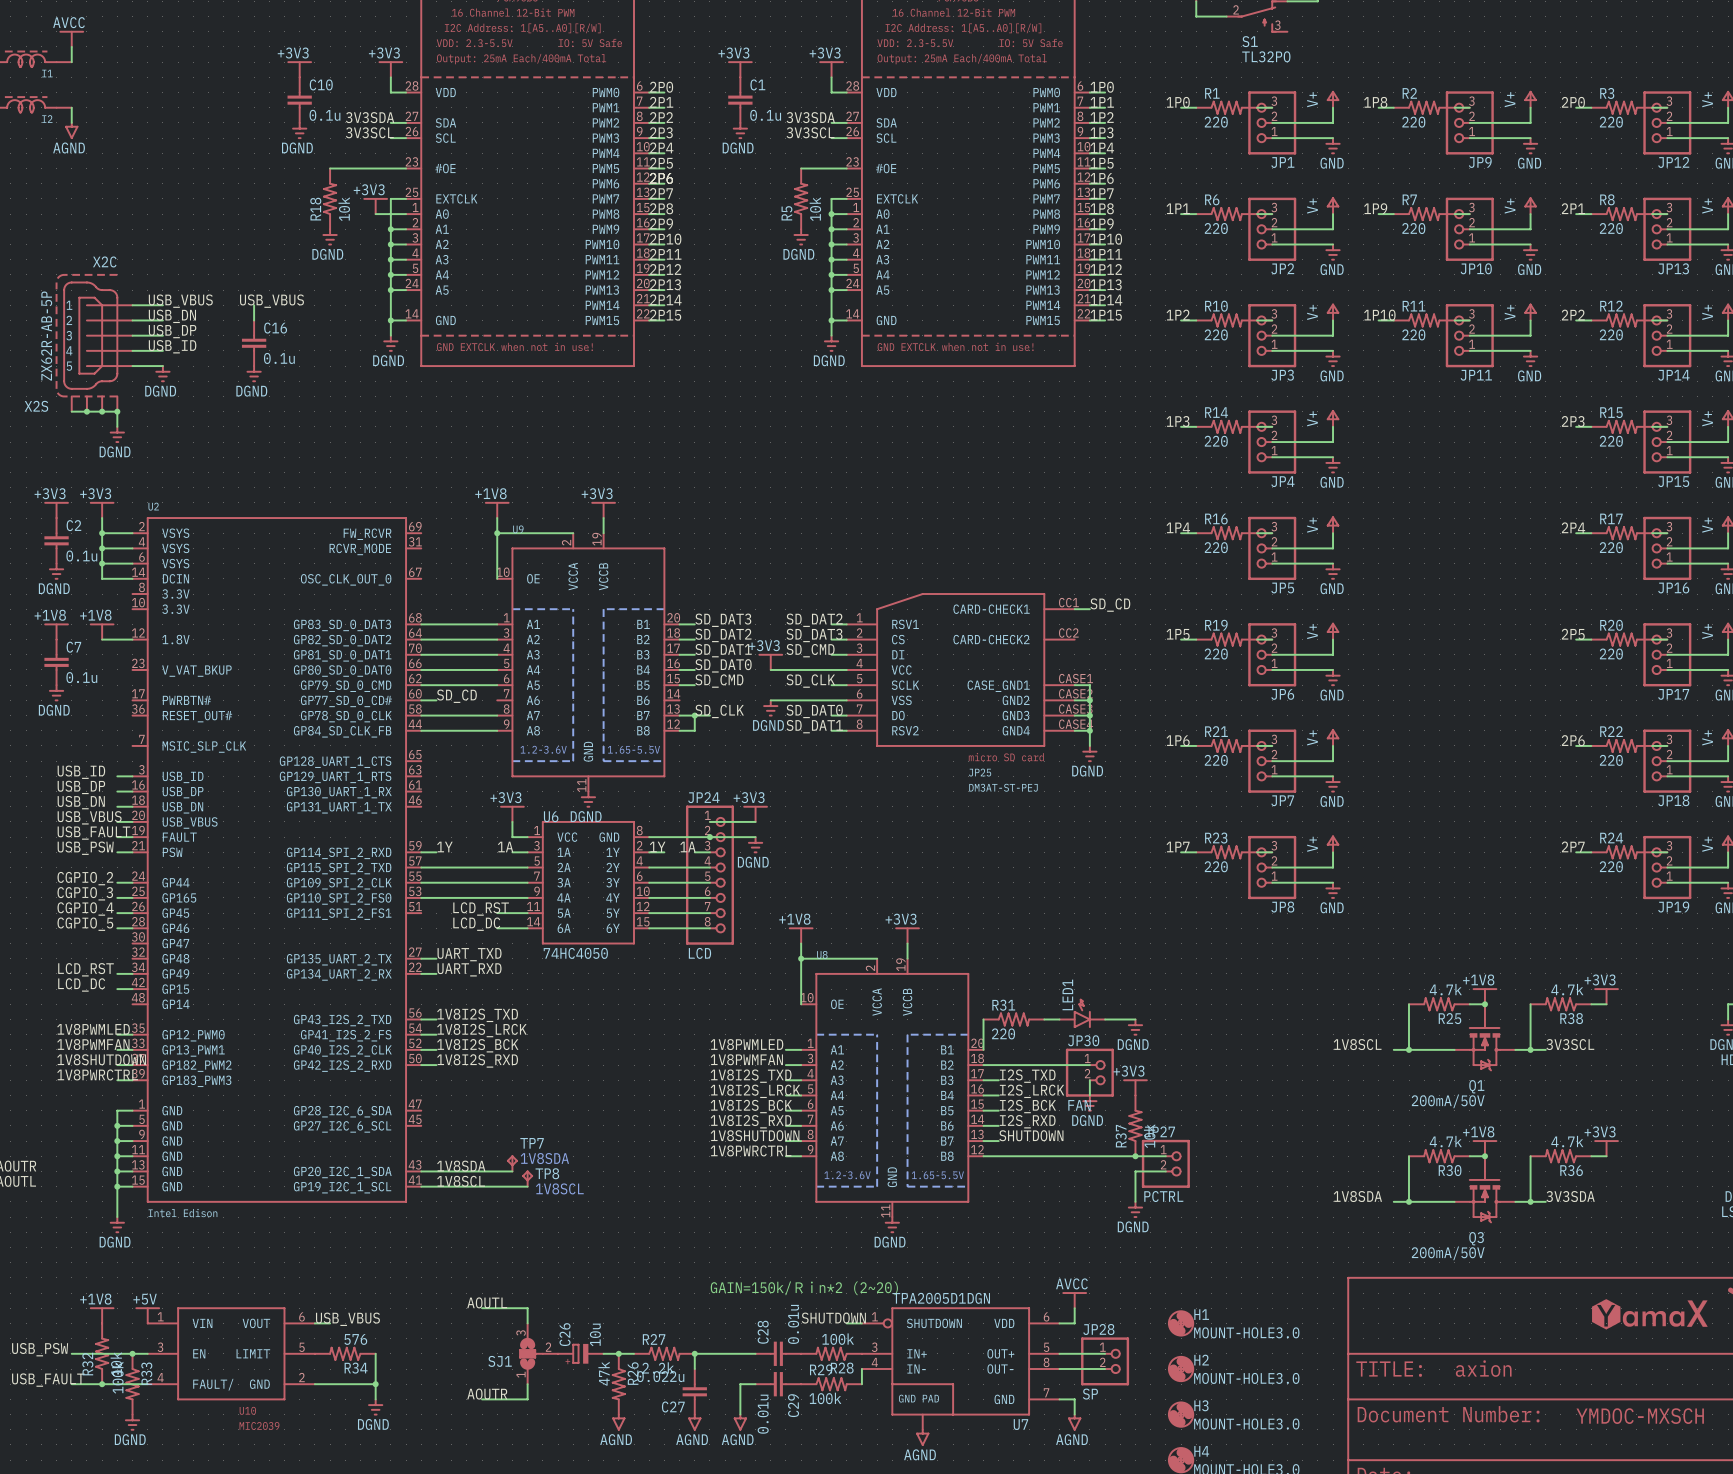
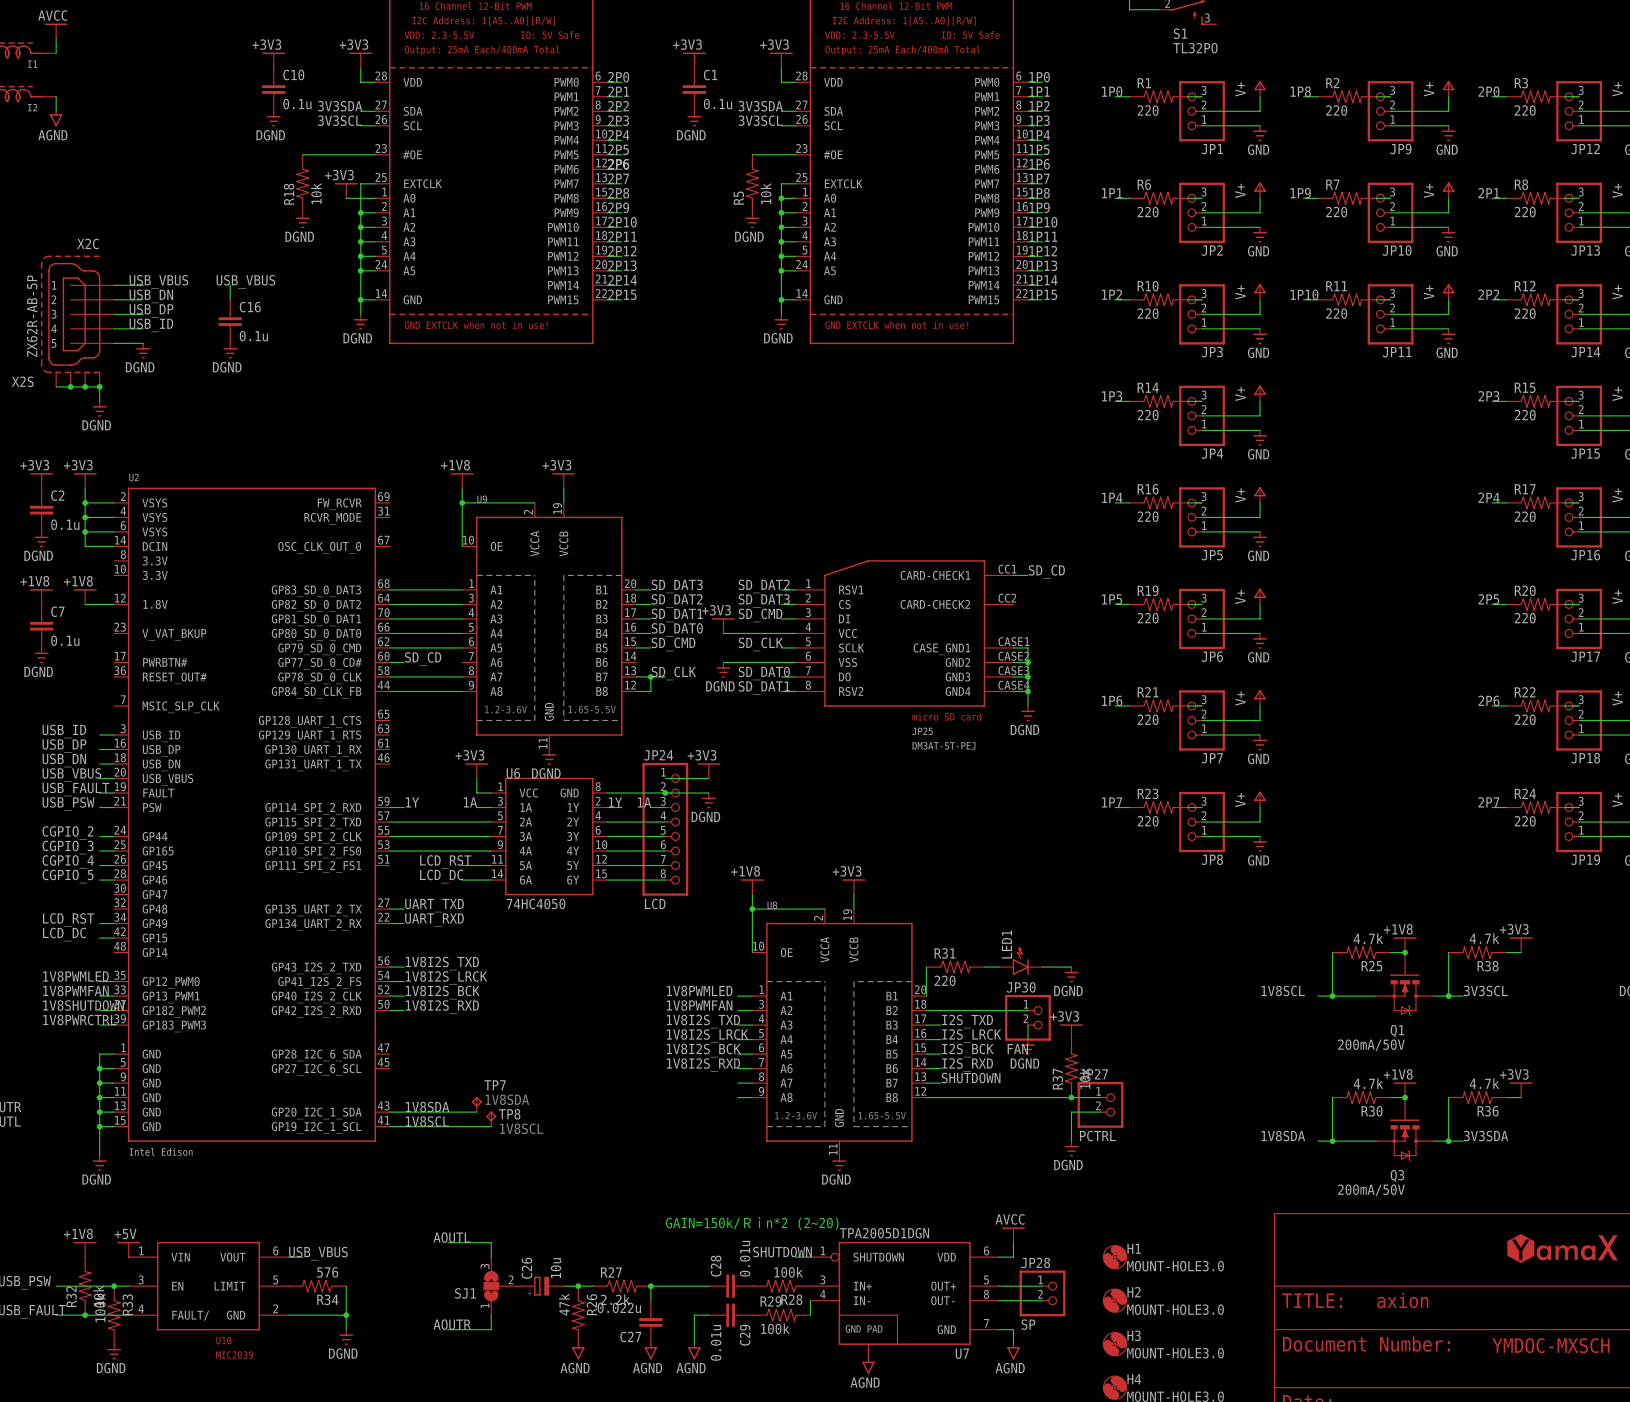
label: 1V8SHUTDOWN (755, 1135) -> none
label: 1V8PWRCTRL (751, 1150) -> none

